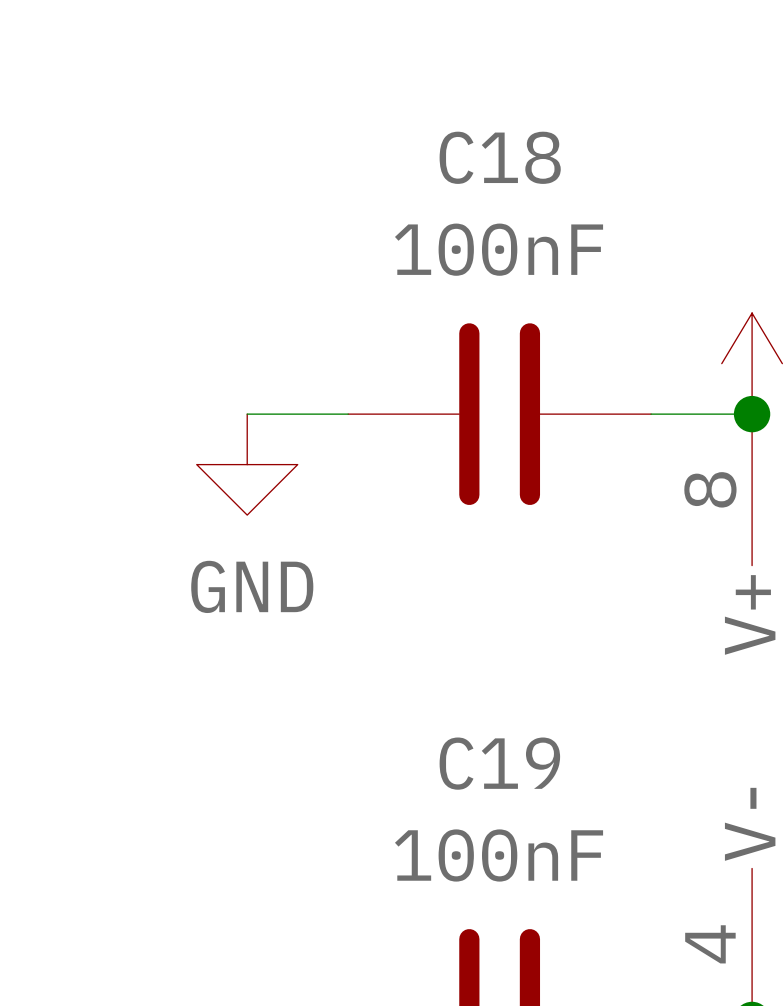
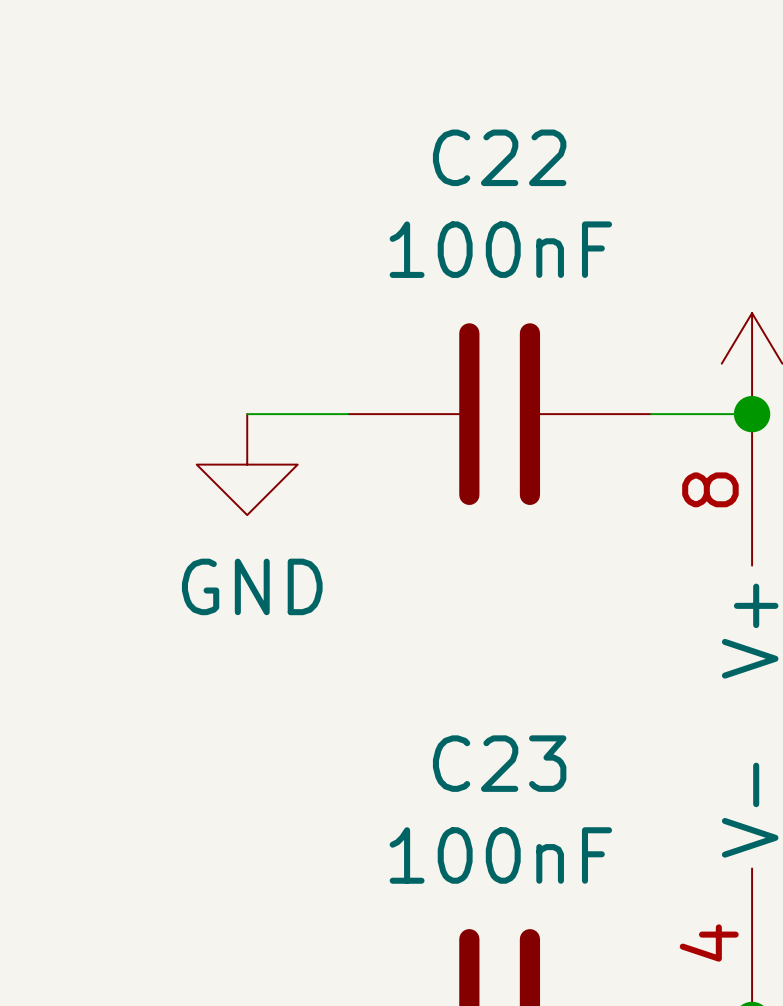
C18 name: C18 (500, 157) -> C22 (499, 157)
C19 name: C19 (499, 763) -> C23 (499, 763)

